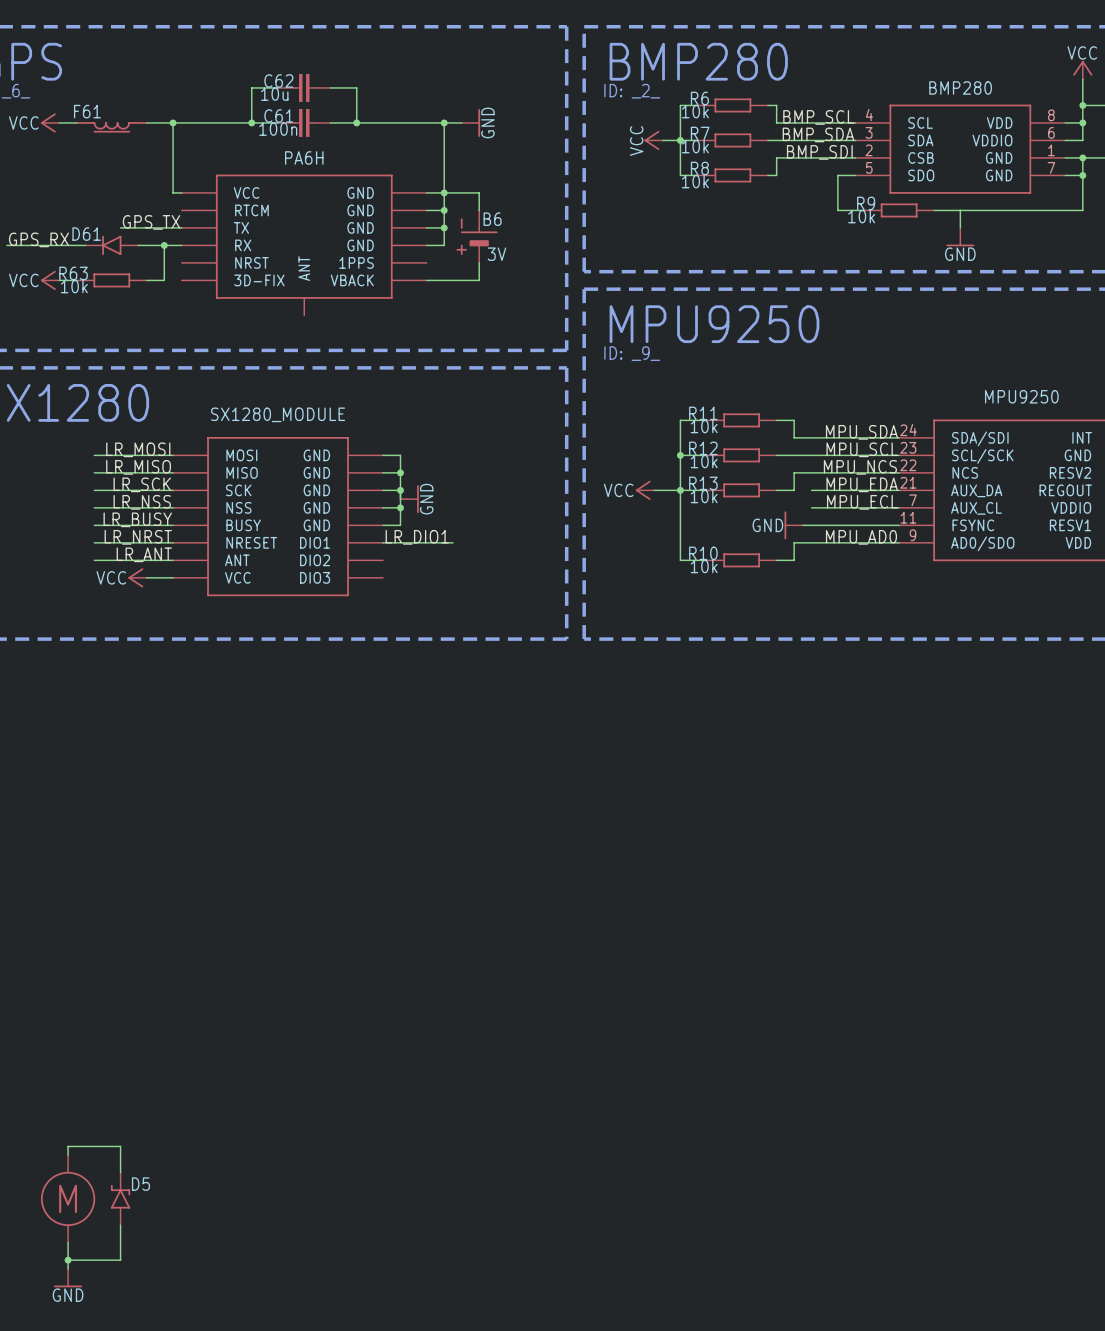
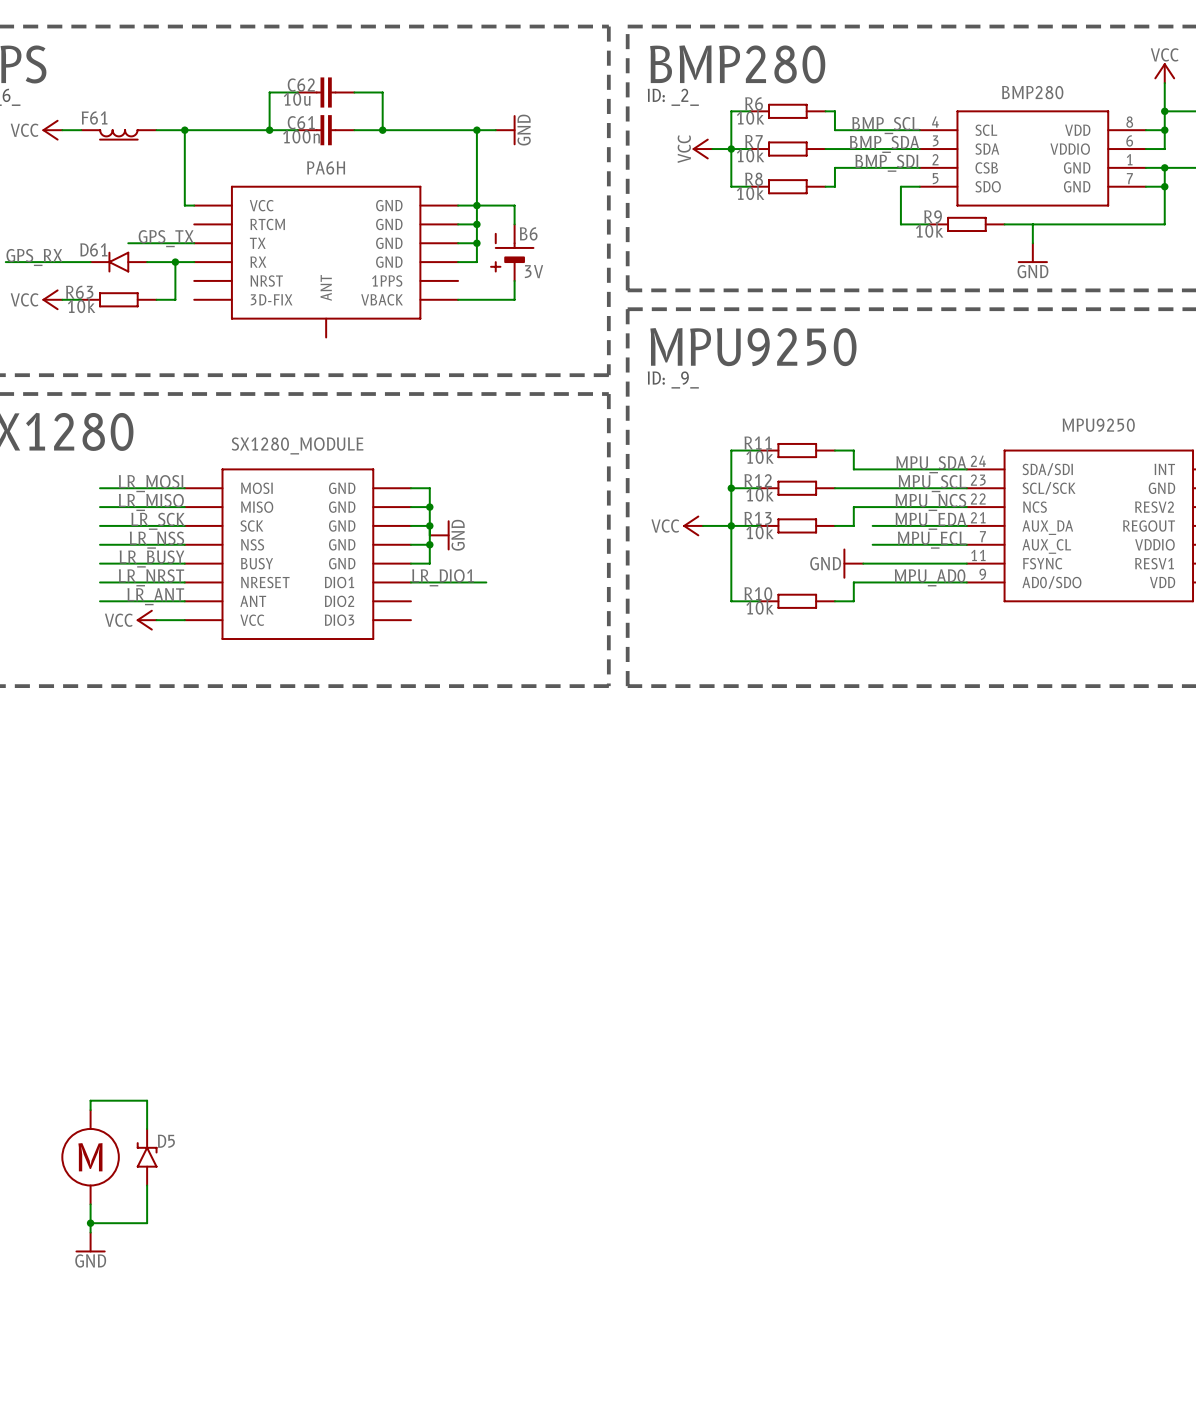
junction: none -> (90, 1223)
wire: (68, 1155) (68, 1146) (120, 1146) (120, 1172) -> (90, 1110) (90, 1100) (147, 1100) (147, 1128)
part position: (68, 1198) -> (90, 1157)
D5 position: (120, 1198) -> (147, 1157)
wire: (120, 1225) (120, 1260) (68, 1260) -> (147, 1185) (147, 1223) (90, 1223)
wire: (68, 1242) (68, 1268) -> (90, 1204) (90, 1232)
junction: (68, 1260) -> none
power symbol position: GND (68, 1278) -> GND (90, 1242)

